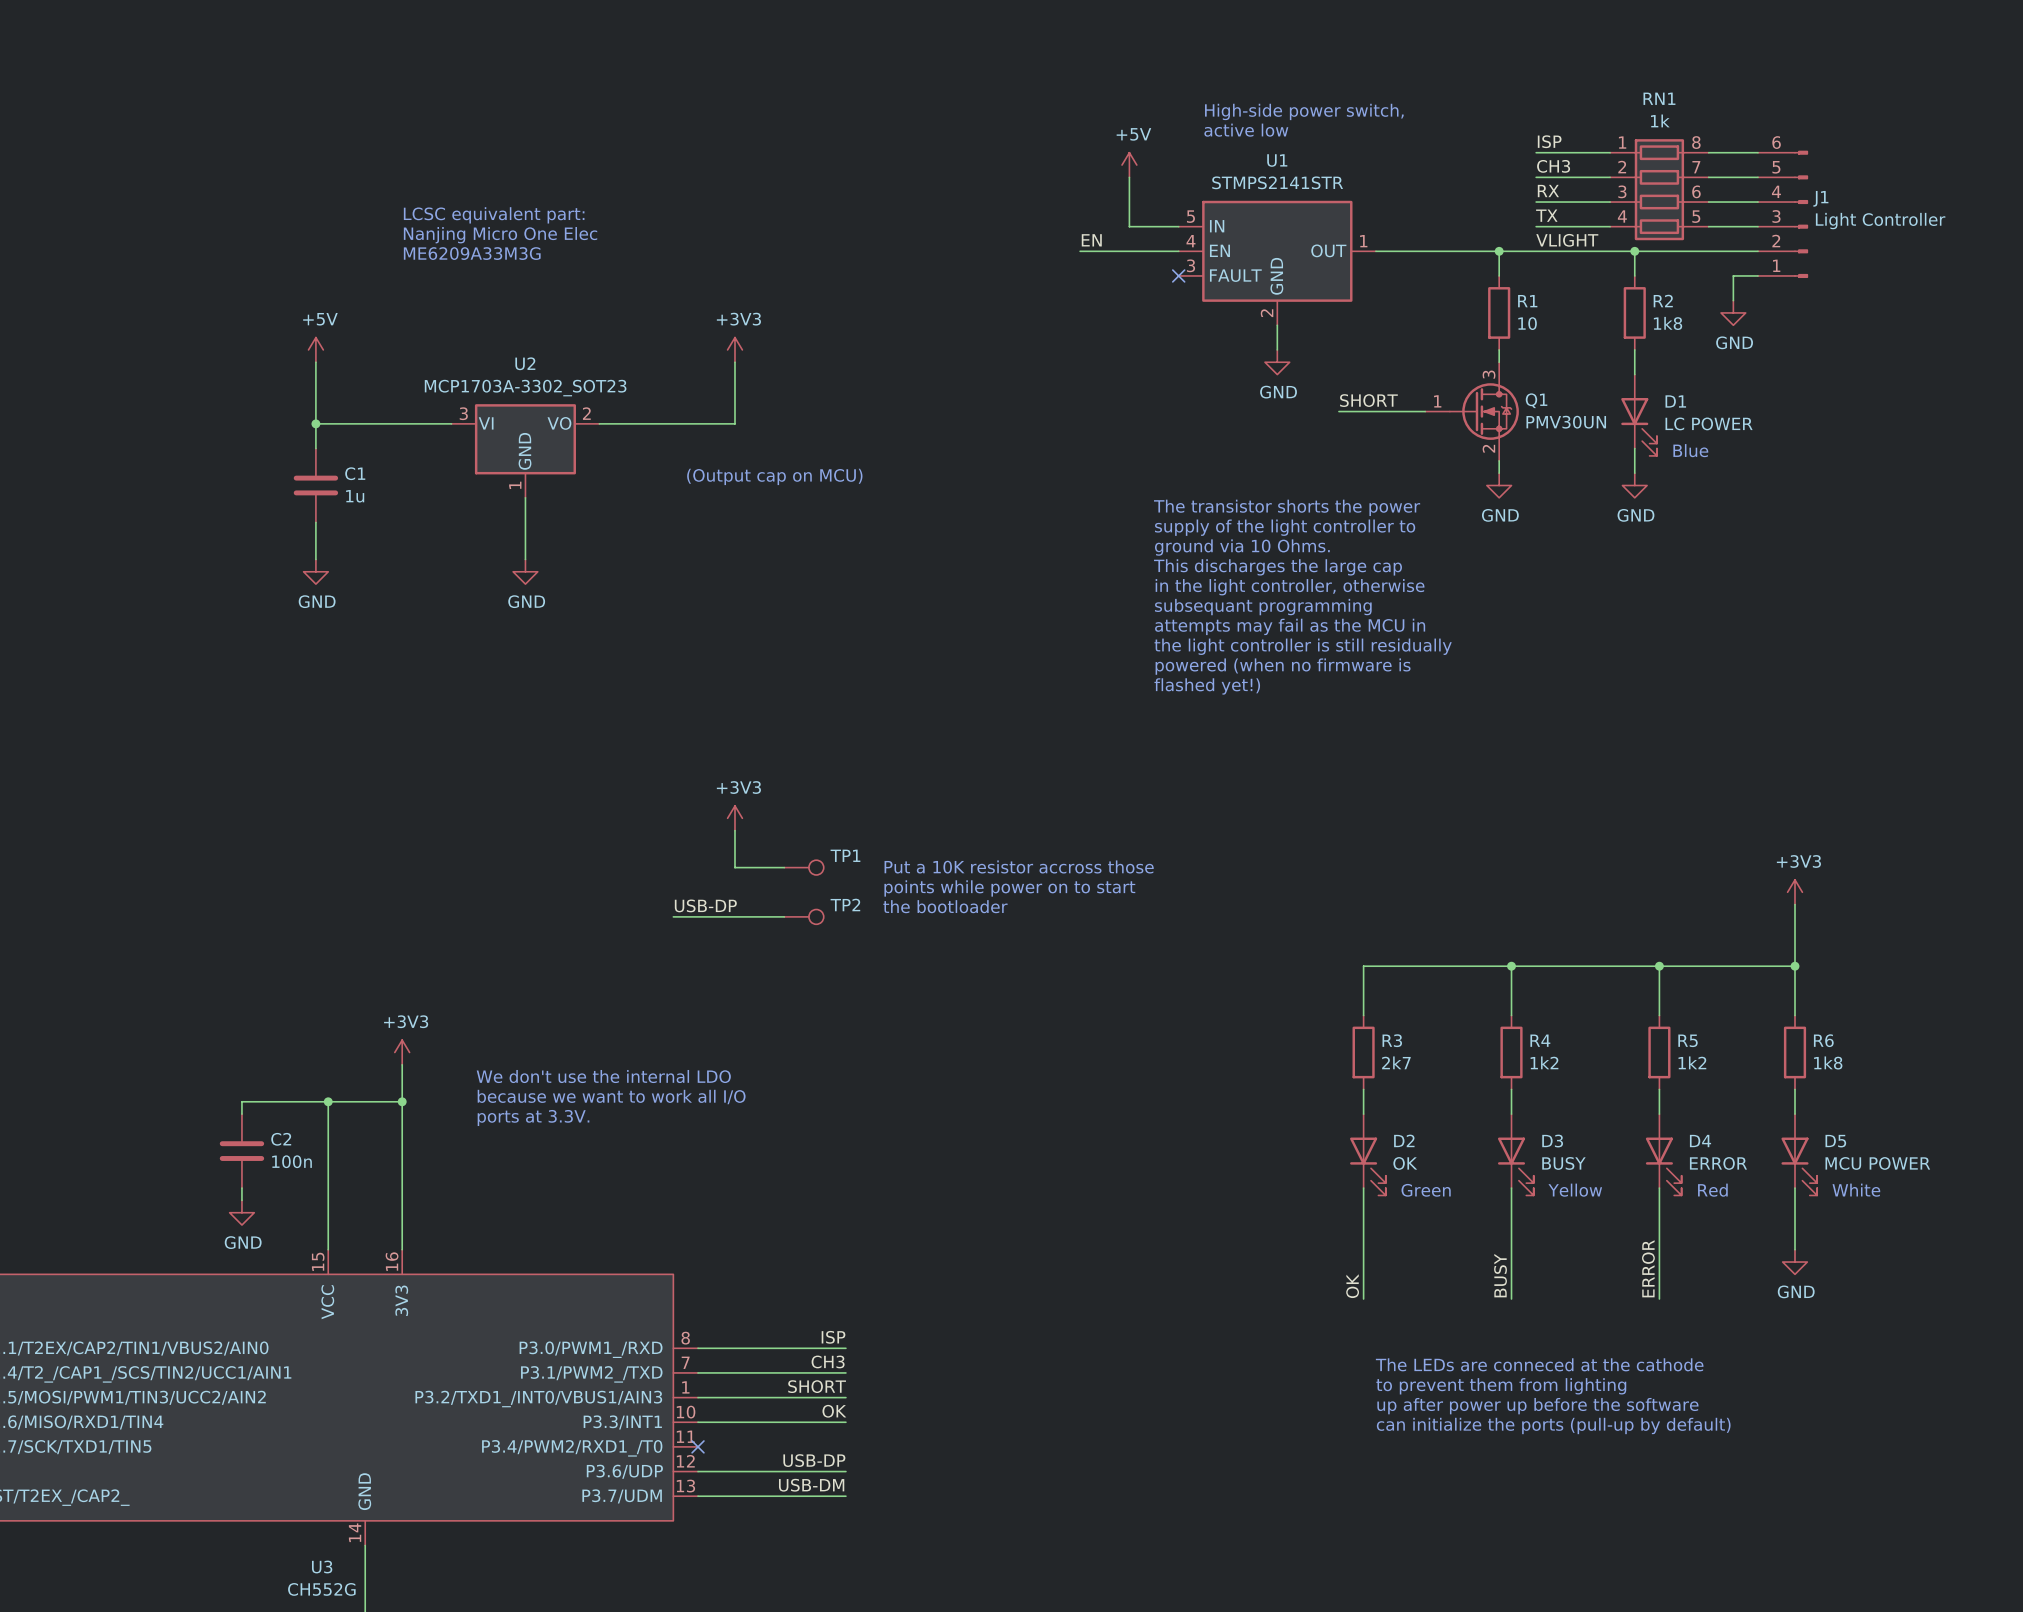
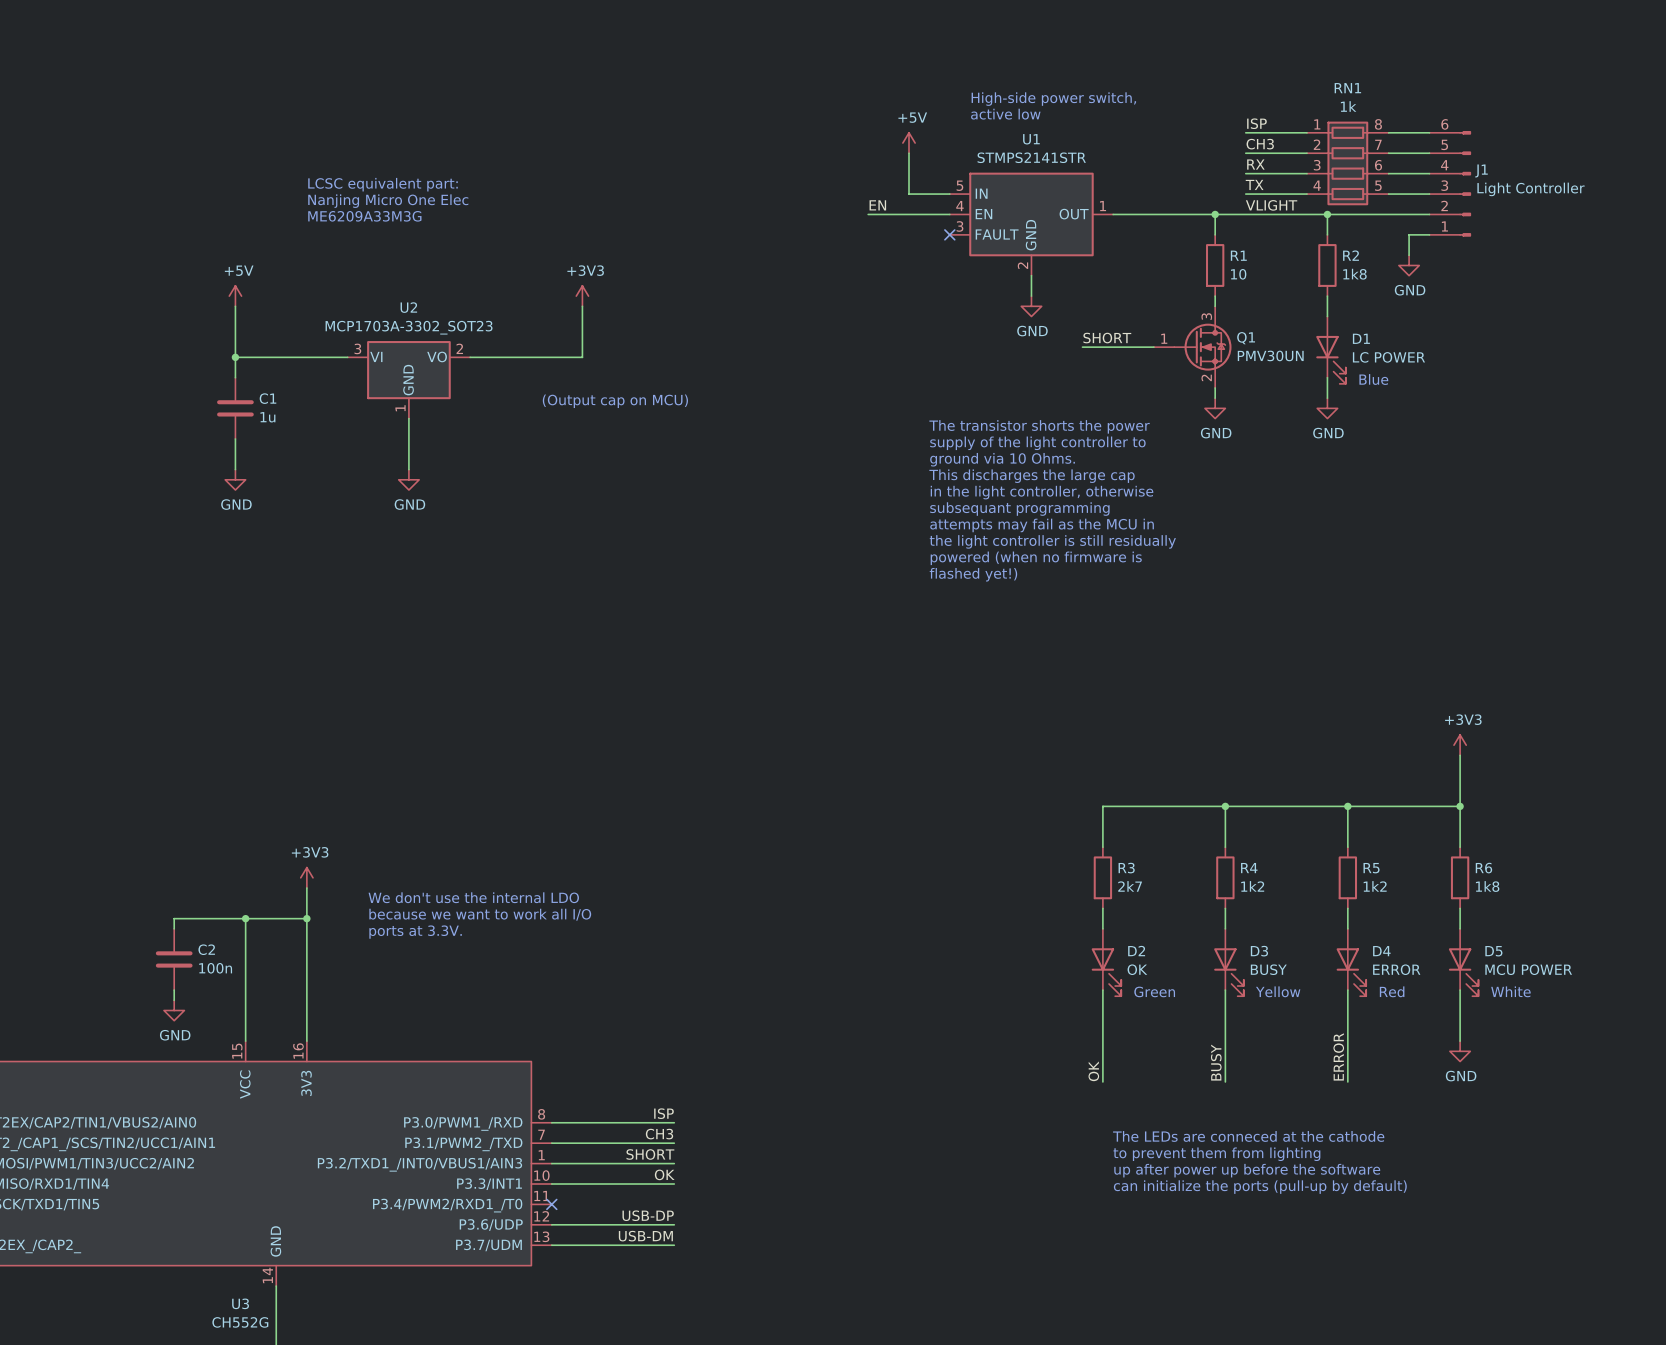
power symbol: +3V3 (734, 818) -> none
wire: (734, 830) (734, 867) (784, 867) -> none
text: Put a 10K resistor accross those (1019, 866) -> none
TP1: (804, 867) -> none
text: points while power on to start (1009, 888) -> none
label: USB-DP (705, 905) -> none
text: the bootloader (945, 906) -> none
wire: (673, 916) (784, 916) -> none
TP2: (804, 916) -> none

